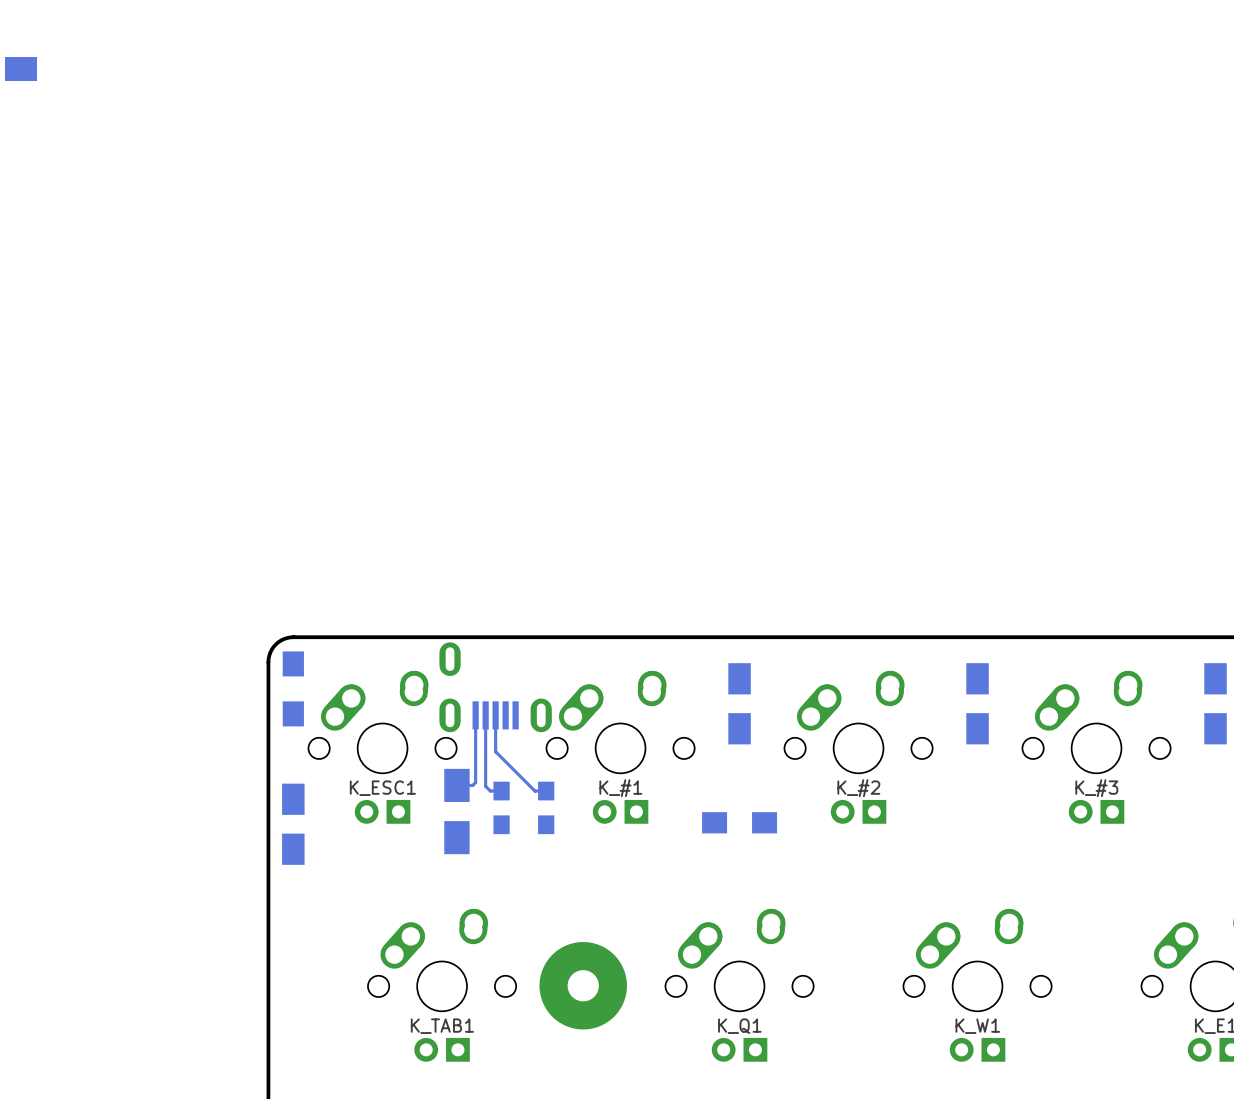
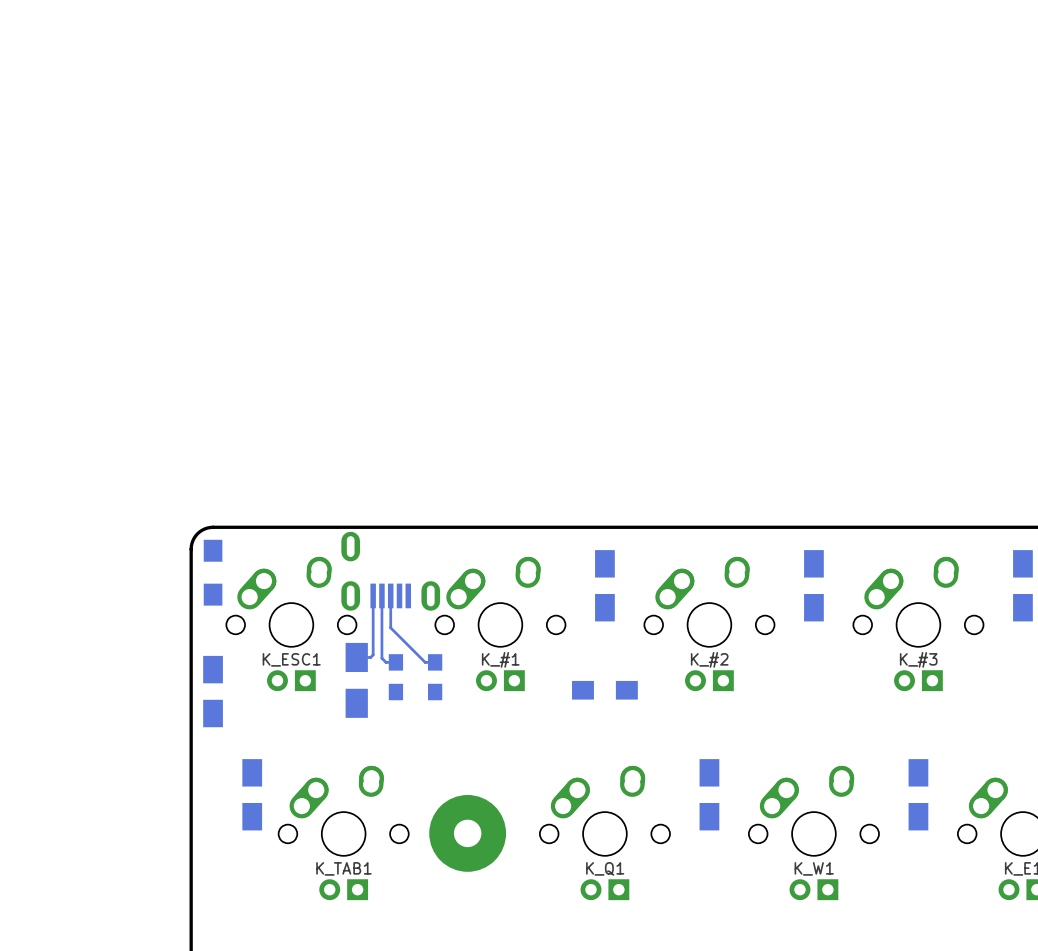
part: none -> (252, 794)
part: none -> (709, 794)
part: none -> (918, 794)

